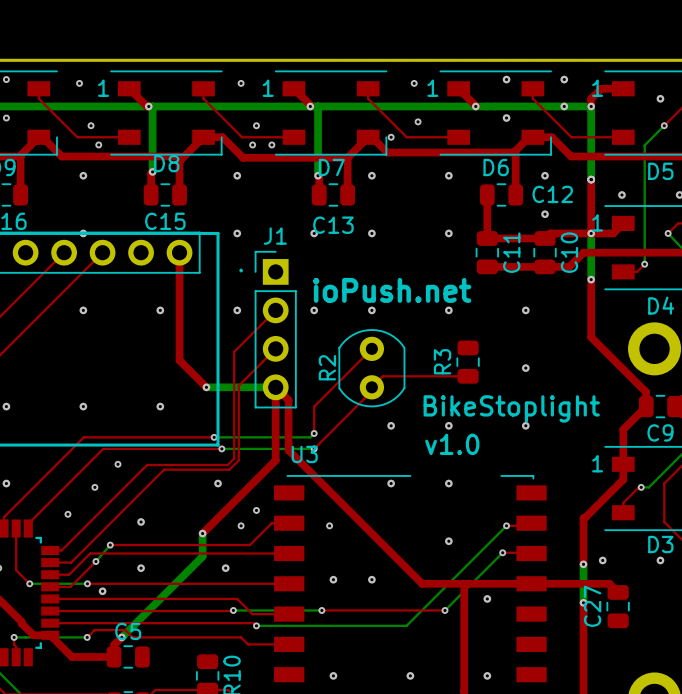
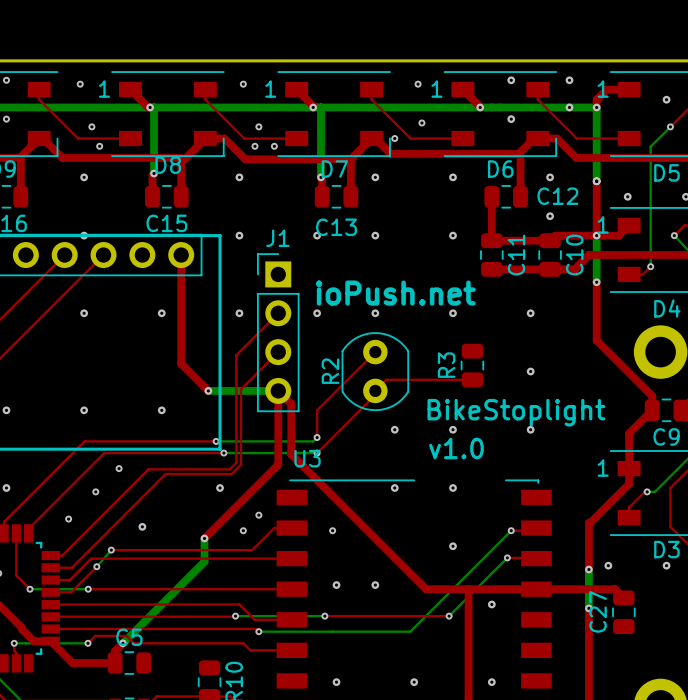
text: . (241, 270) -> none
via: (141, 568) -> none
via: (225, 568) -> none
via: (102, 591) -> none

